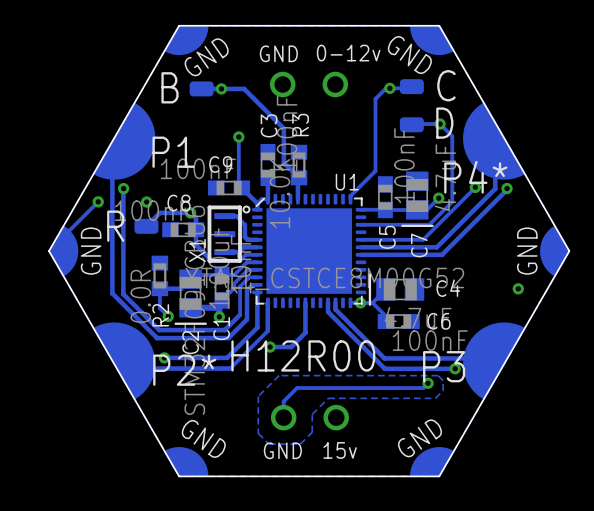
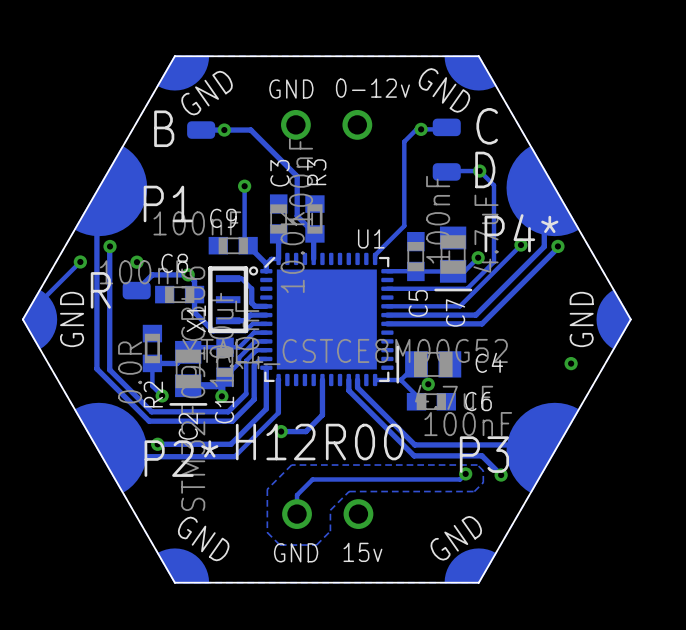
via position: (360, 302) -> (428, 384)
track: (383, 367) (455, 368) -> (414, 455) (481, 455) (501, 475)
via position: (455, 368) -> (501, 475)

